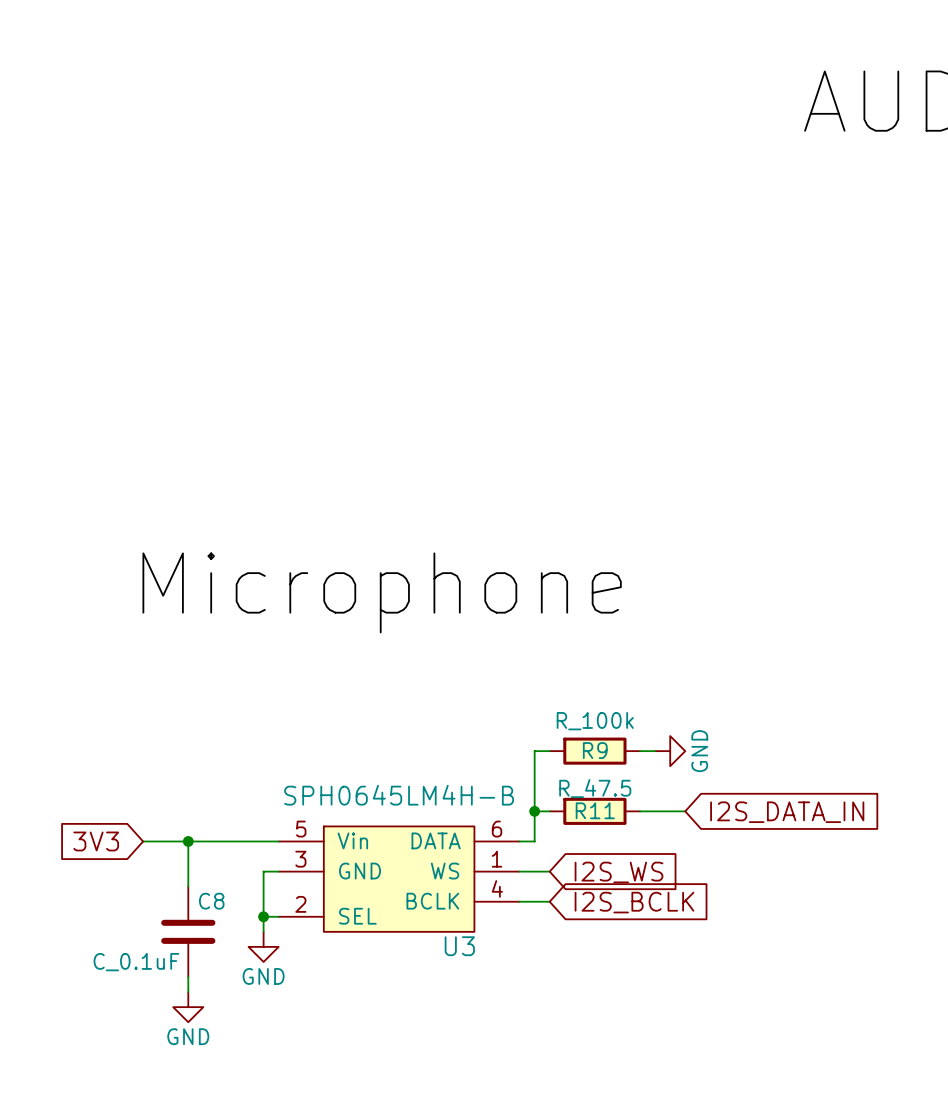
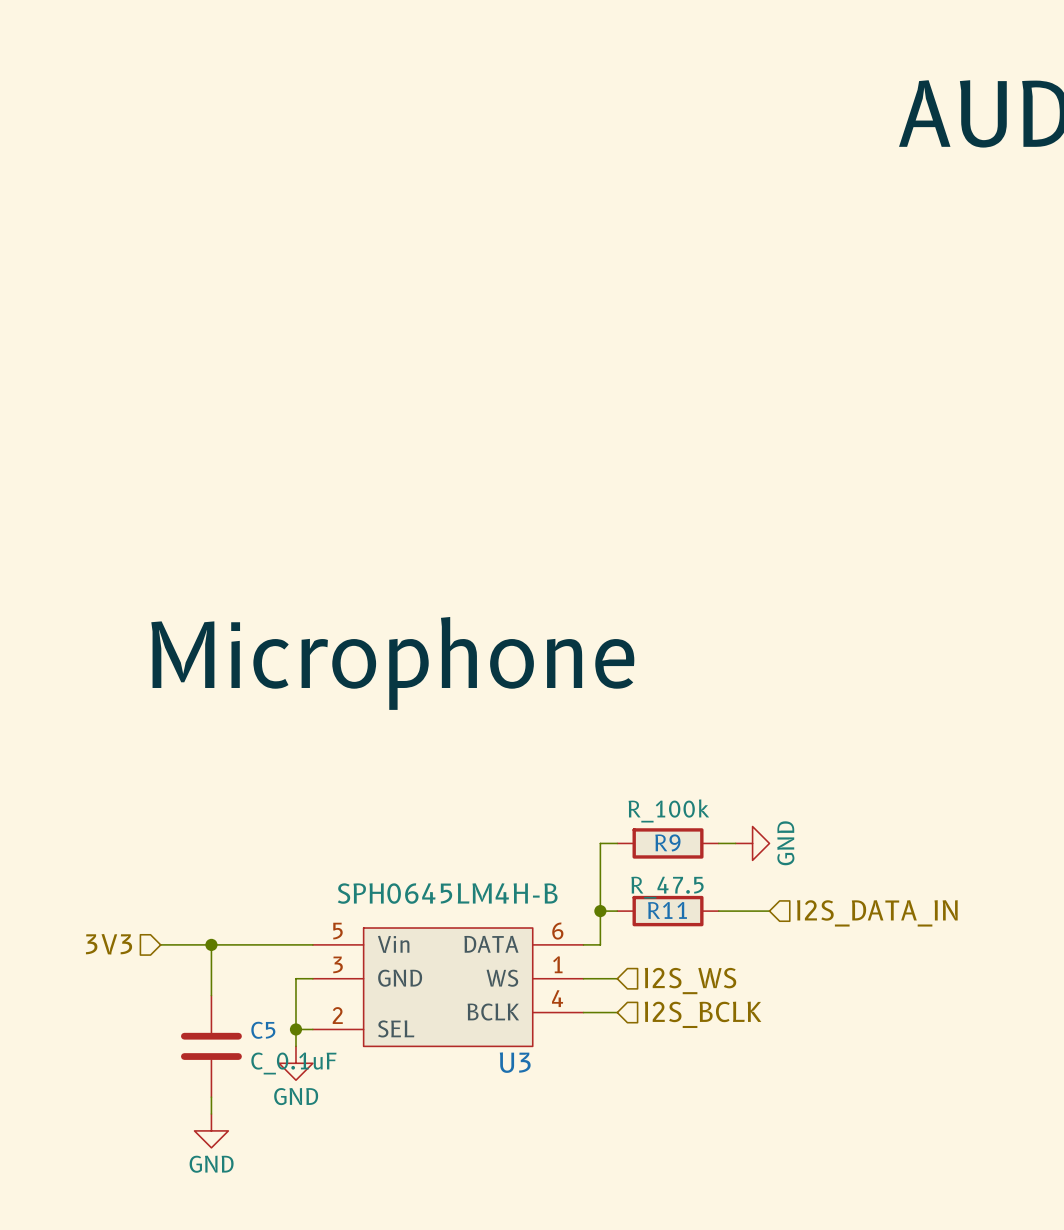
hierarchical label: none -> I2S_DATA_IN (877, 913)
global label: I2S_DATA_IN (787, 812) -> none
hierarchical label: none -> 3V3 (109, 944)
global label: 3V3 (96, 841) -> none
hierarchical label: none -> I2S_WS (690, 981)
global label: I2S_WS (619, 872) -> none
C8 name: C8 (211, 901) -> C5 (263, 1030)
hierarchical label: none -> I2S_BCLK (703, 1014)
global label: I2S_BCLK (634, 902) -> none
C8 value position: C_0.1uF (136, 962) -> C_0.1uF (293, 1063)

